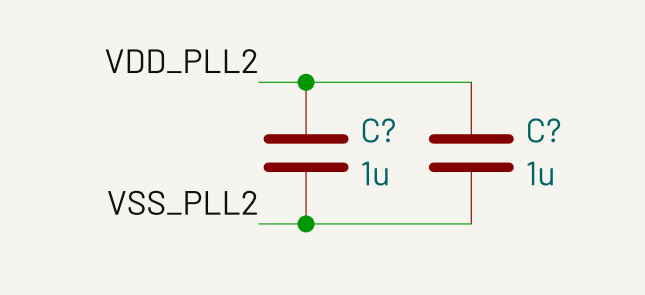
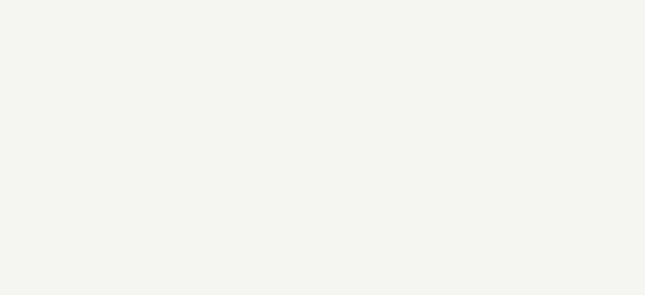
label: VDD_PLL2 (181, 61) -> none
wire: (258, 82) (471, 82) -> none
junction: (306, 82) -> none
C?: 1u (306, 153) -> none
C?: 1u (471, 153) -> none
label: VSS_PLL2 (182, 202) -> none
wire: (258, 223) (471, 223) -> none
junction: (306, 223) -> none

